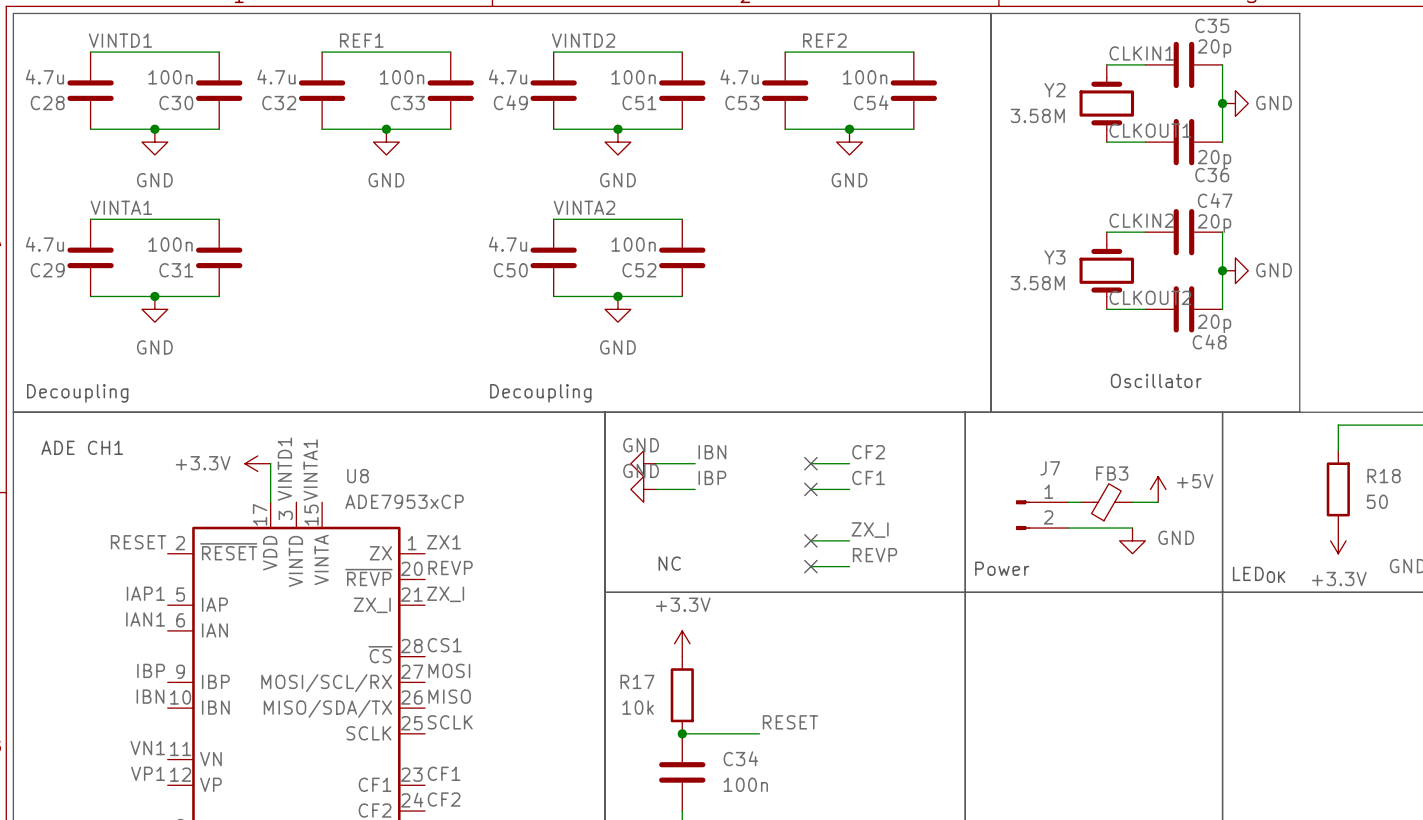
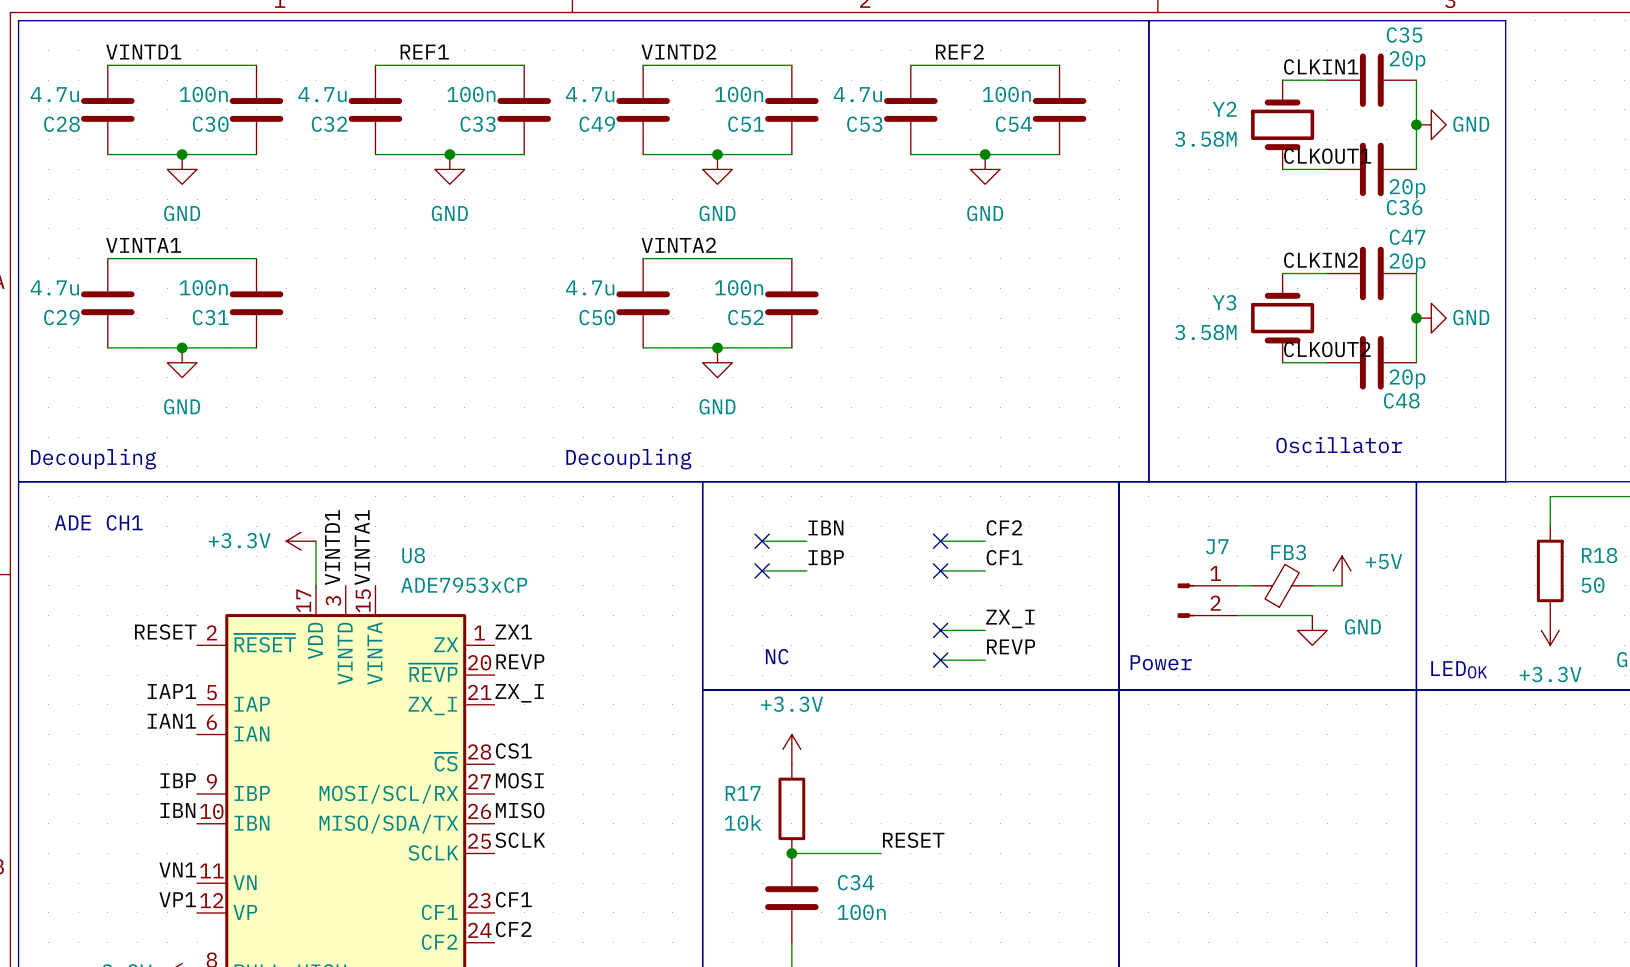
power symbol: GND (643, 463) -> none
no-connect mark: none -> (762, 541)
power symbol: GND (643, 489) -> none
no-connect mark: none -> (762, 570)

